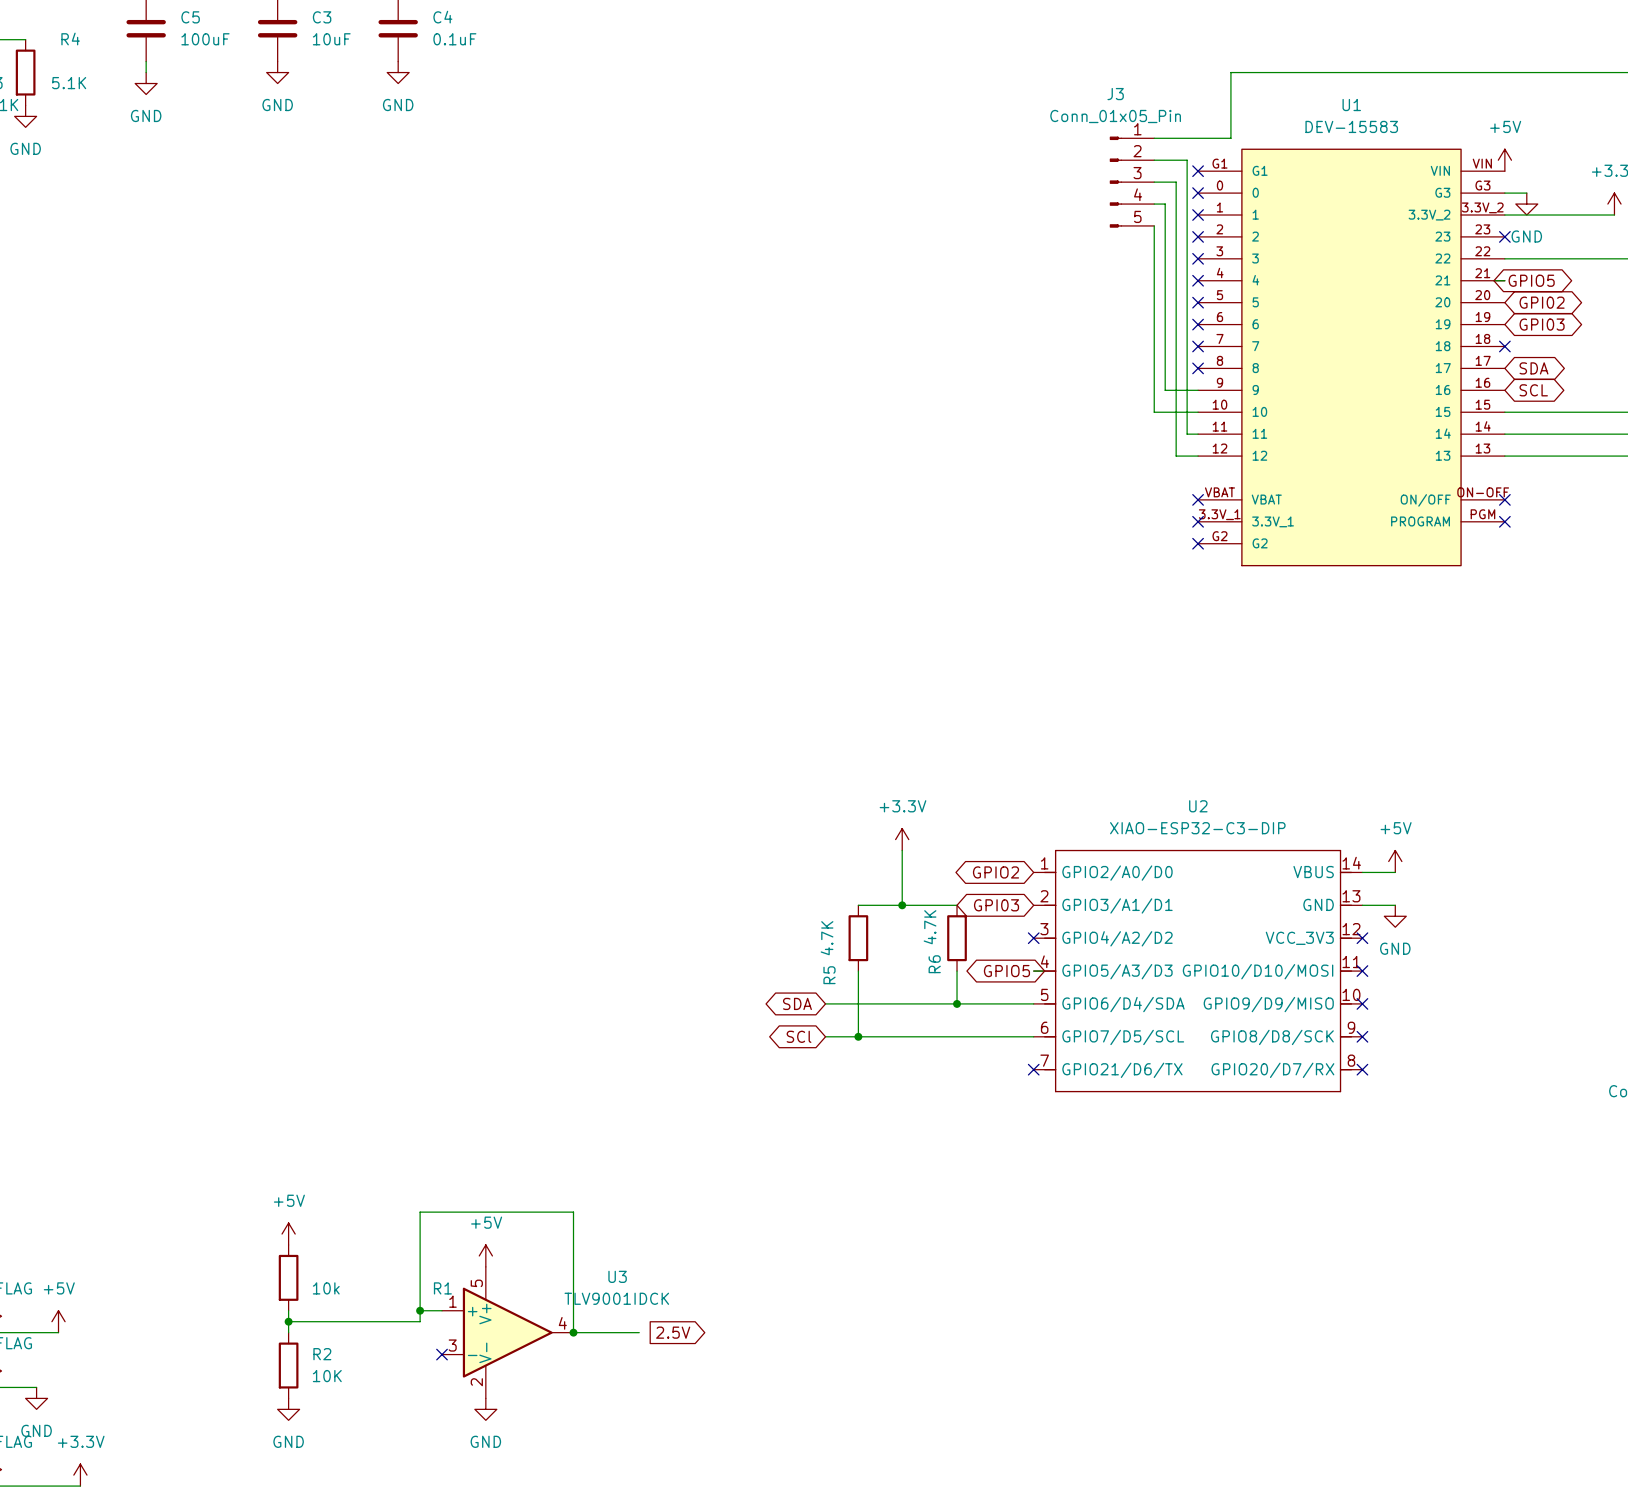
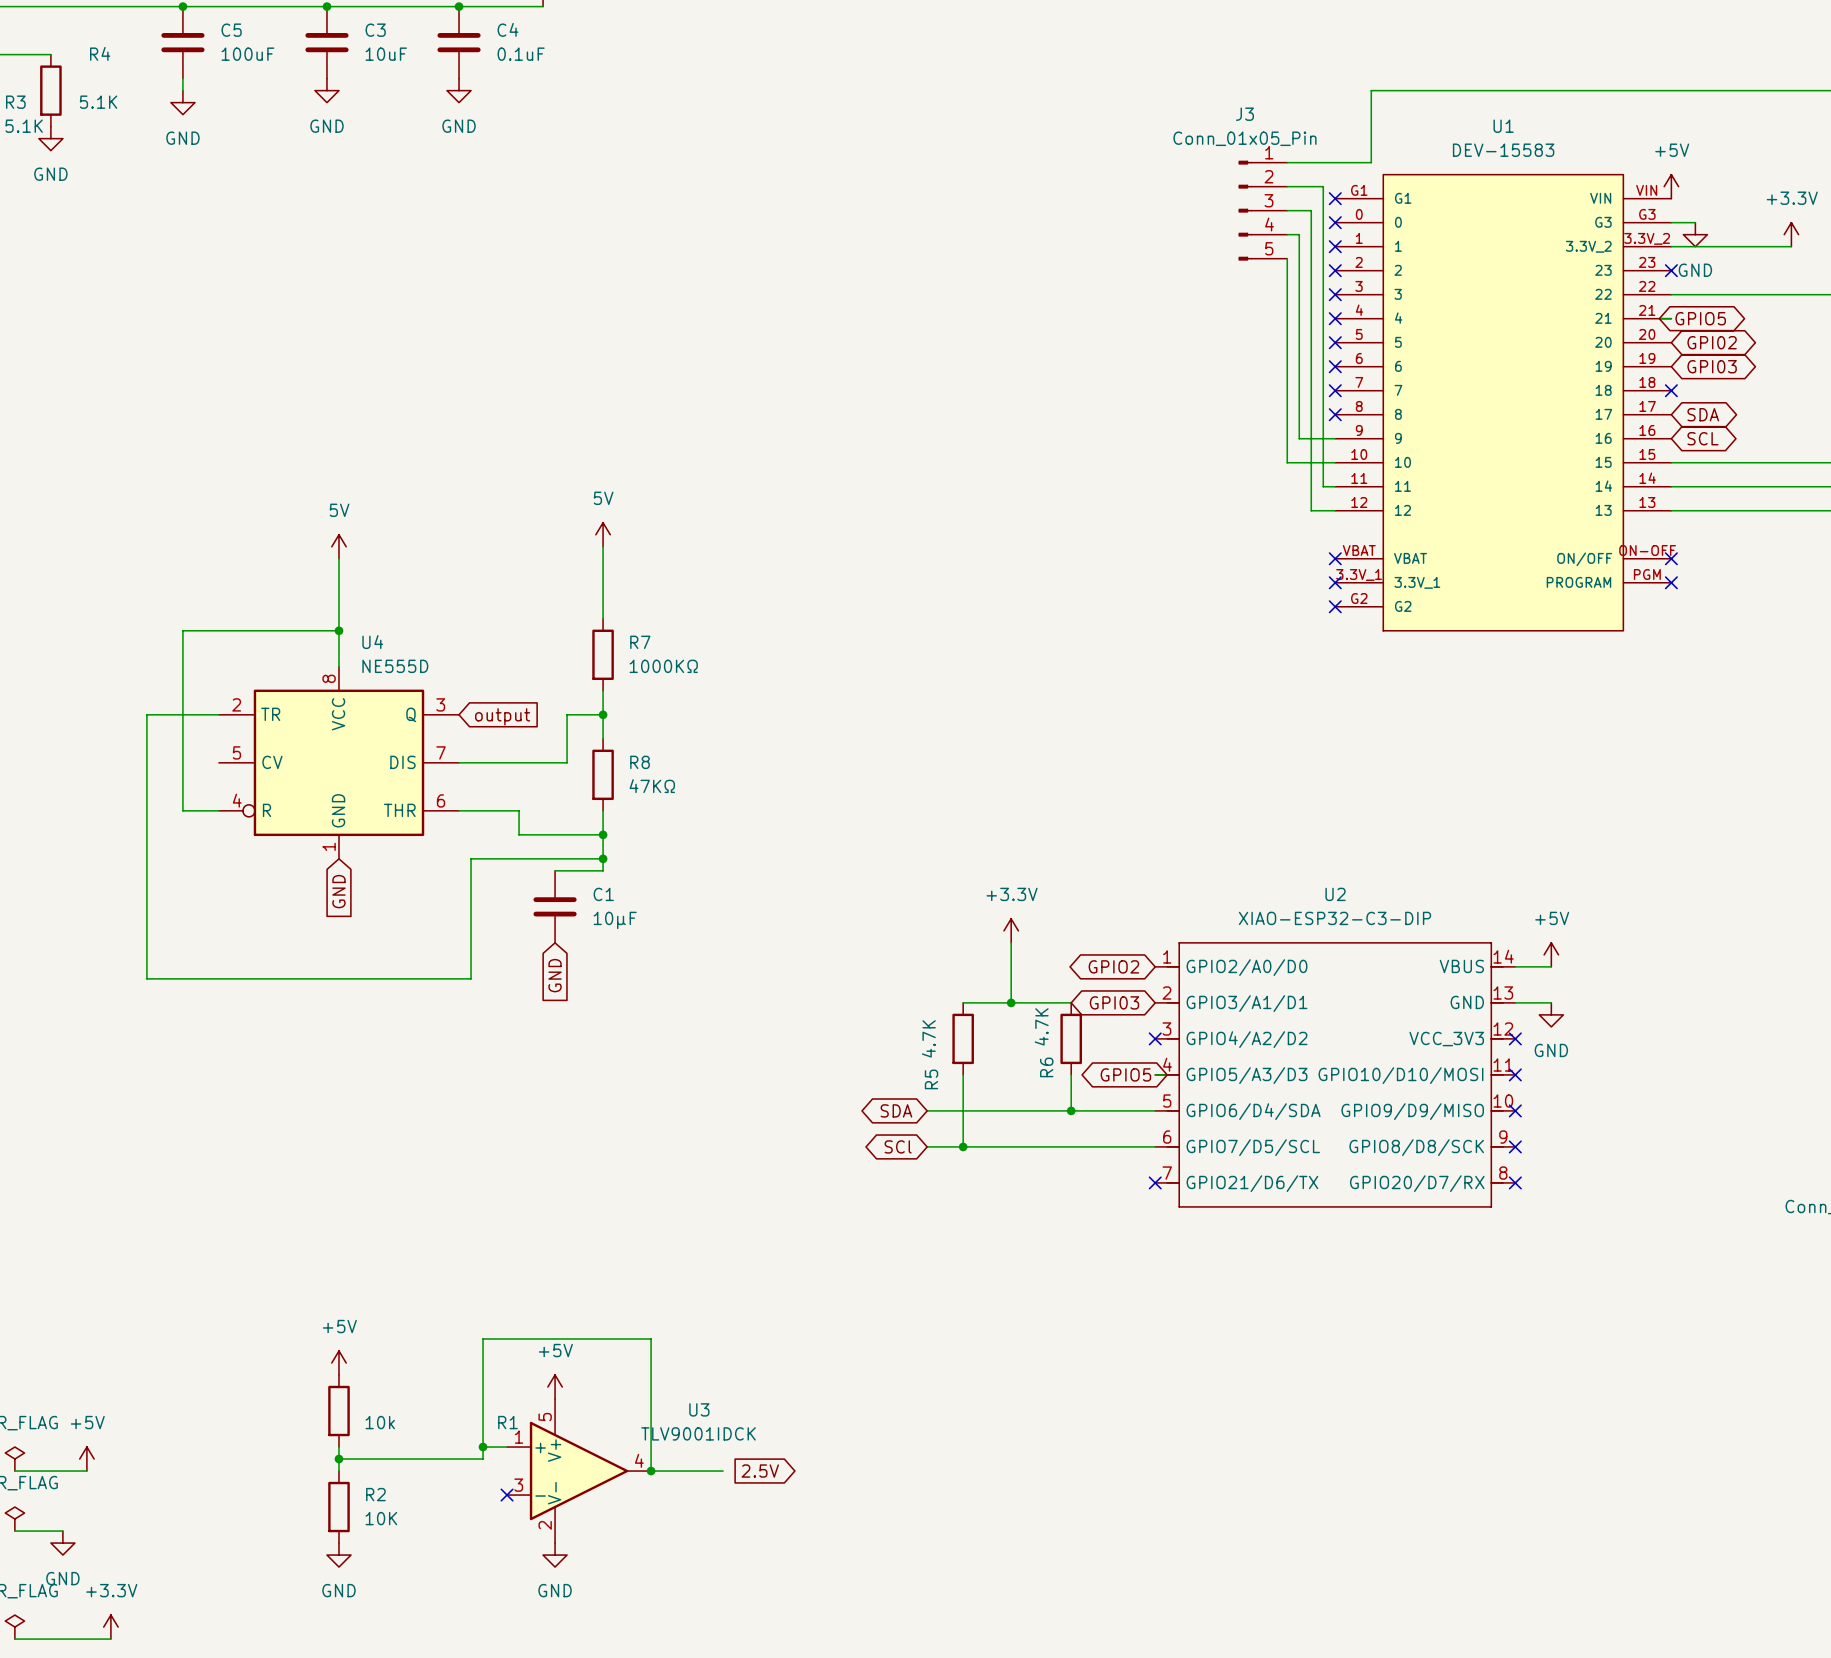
power symbol: none -> 5V (603, 534)
power symbol: none -> 5V (338, 546)
wire: none -> (603, 546) (603, 618)
wire: none -> (338, 558) (338, 666)
wire: none -> (338, 630) (182, 630) (182, 810) (218, 810)
junction: none -> (338, 630)
R7: none -> 1000KΩ (603, 654)
wire: none -> (603, 690) (603, 738)
wire: none -> (218, 714) (146, 714) (146, 978) (471, 978) (471, 858) (603, 858)
wire: none -> (603, 714) (567, 714) (567, 762) (459, 762)
junction: none -> (603, 714)
global label: none -> output (502, 716)
U4: none -> NE555D (338, 762)
R8: none -> 47KΩ (603, 774)
wire: none -> (459, 810) (519, 810) (519, 834) (603, 834)
wire: none -> (603, 810) (603, 870) (555, 870)
junction: none -> (603, 834)
junction: none -> (603, 858)
global label: none -> GND (338, 891)
C1: none -> 10μF (555, 906)
global label: none -> GND (555, 975)

